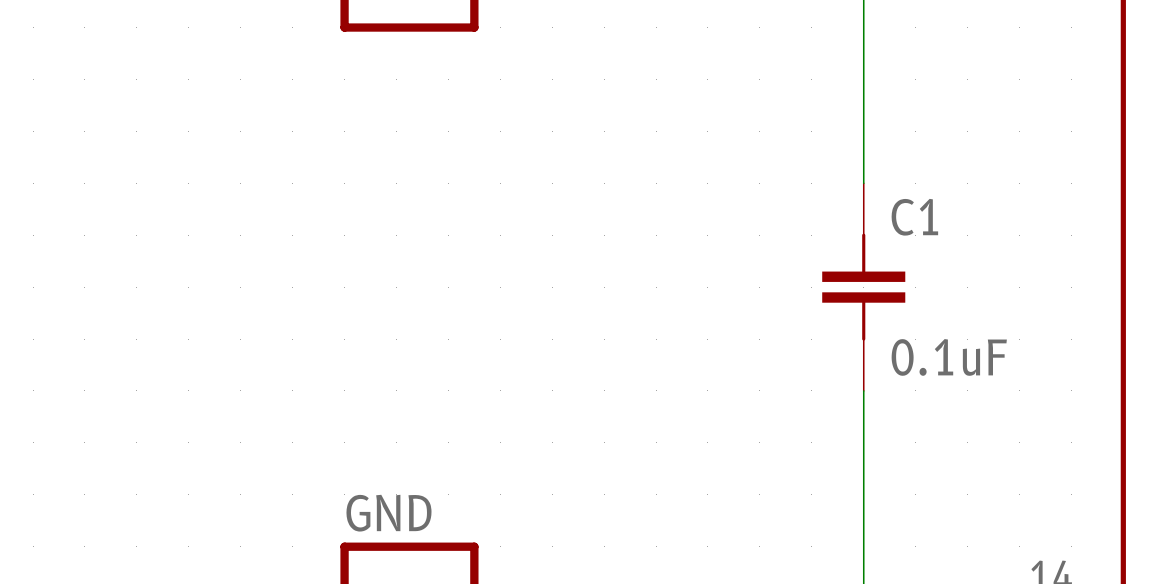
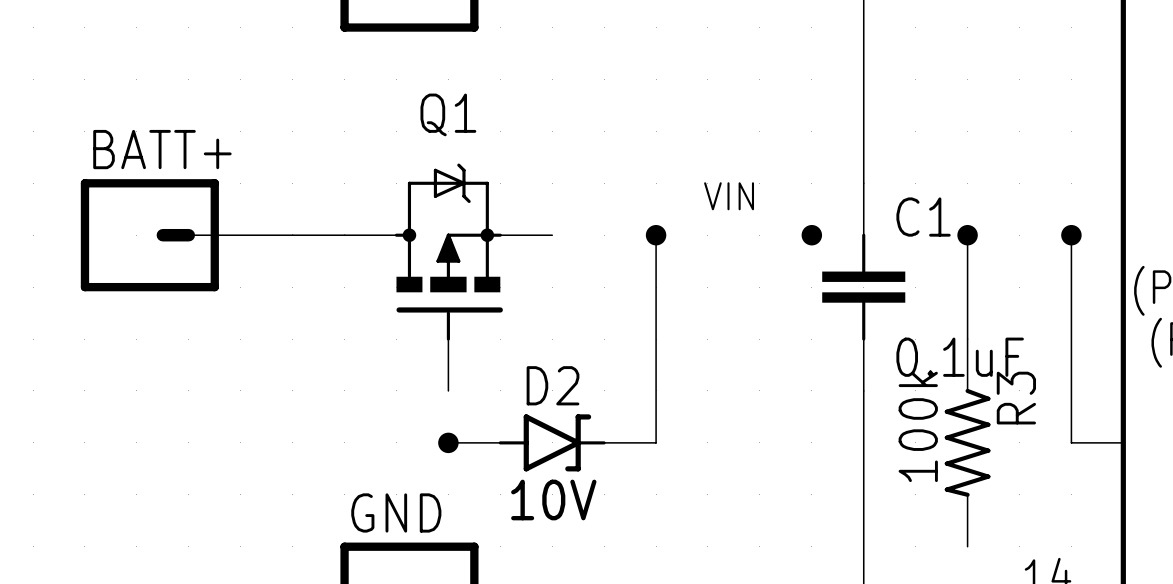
label: none -> VIN (729, 196)
BATT+: none -> (186, 235)
wire: none -> (292, 235) (344, 235)
wire: none -> (656, 235) (656, 442) (604, 442)
junction: none -> (656, 235)
junction: none -> (811, 235)
wire: none -> (967, 235) (967, 339)
junction: none -> (967, 235)
wire: none -> (1071, 235) (1071, 442) (1123, 442)
junction: none -> (1071, 235)
Q1: none -> (448, 277)
wire: none -> (448, 442) (500, 442)
junction: none -> (448, 442)
D2: none -> 10V (552, 442)
R3: none -> 100k (967, 442)

